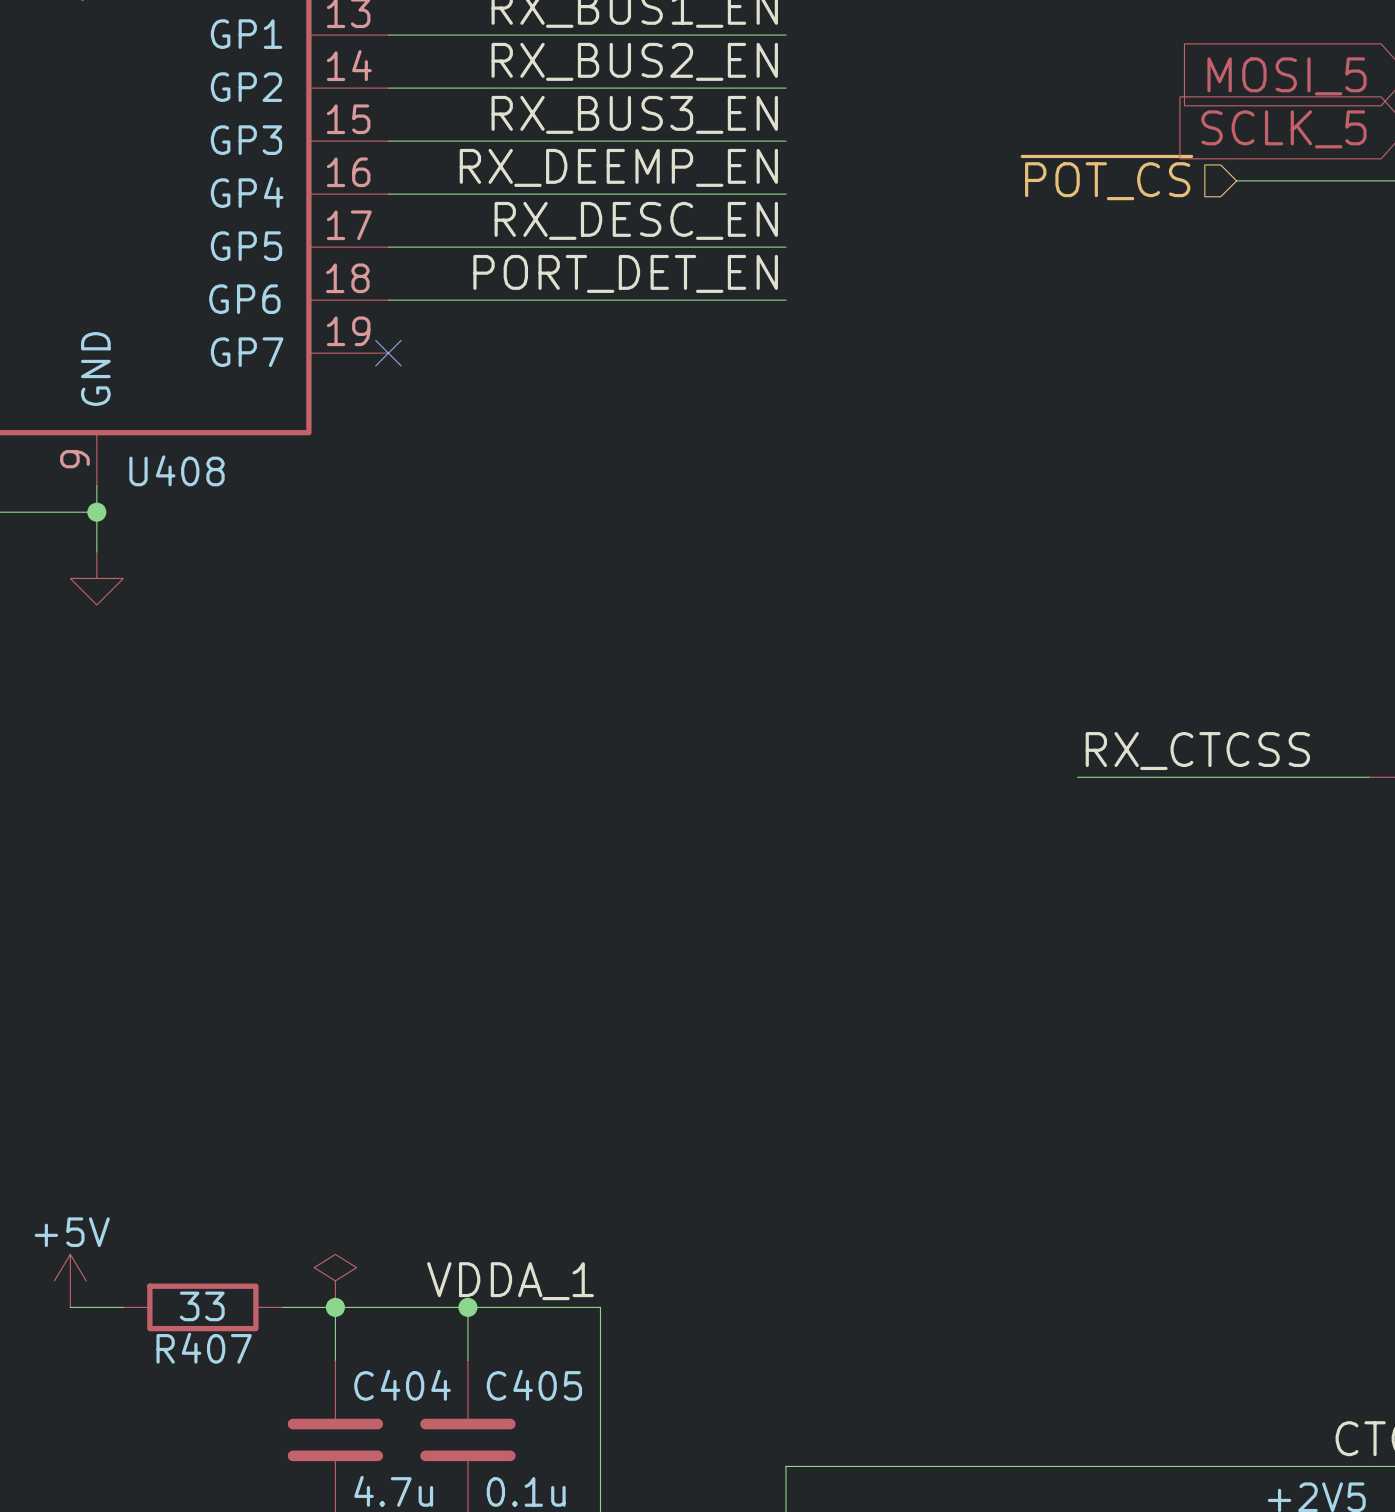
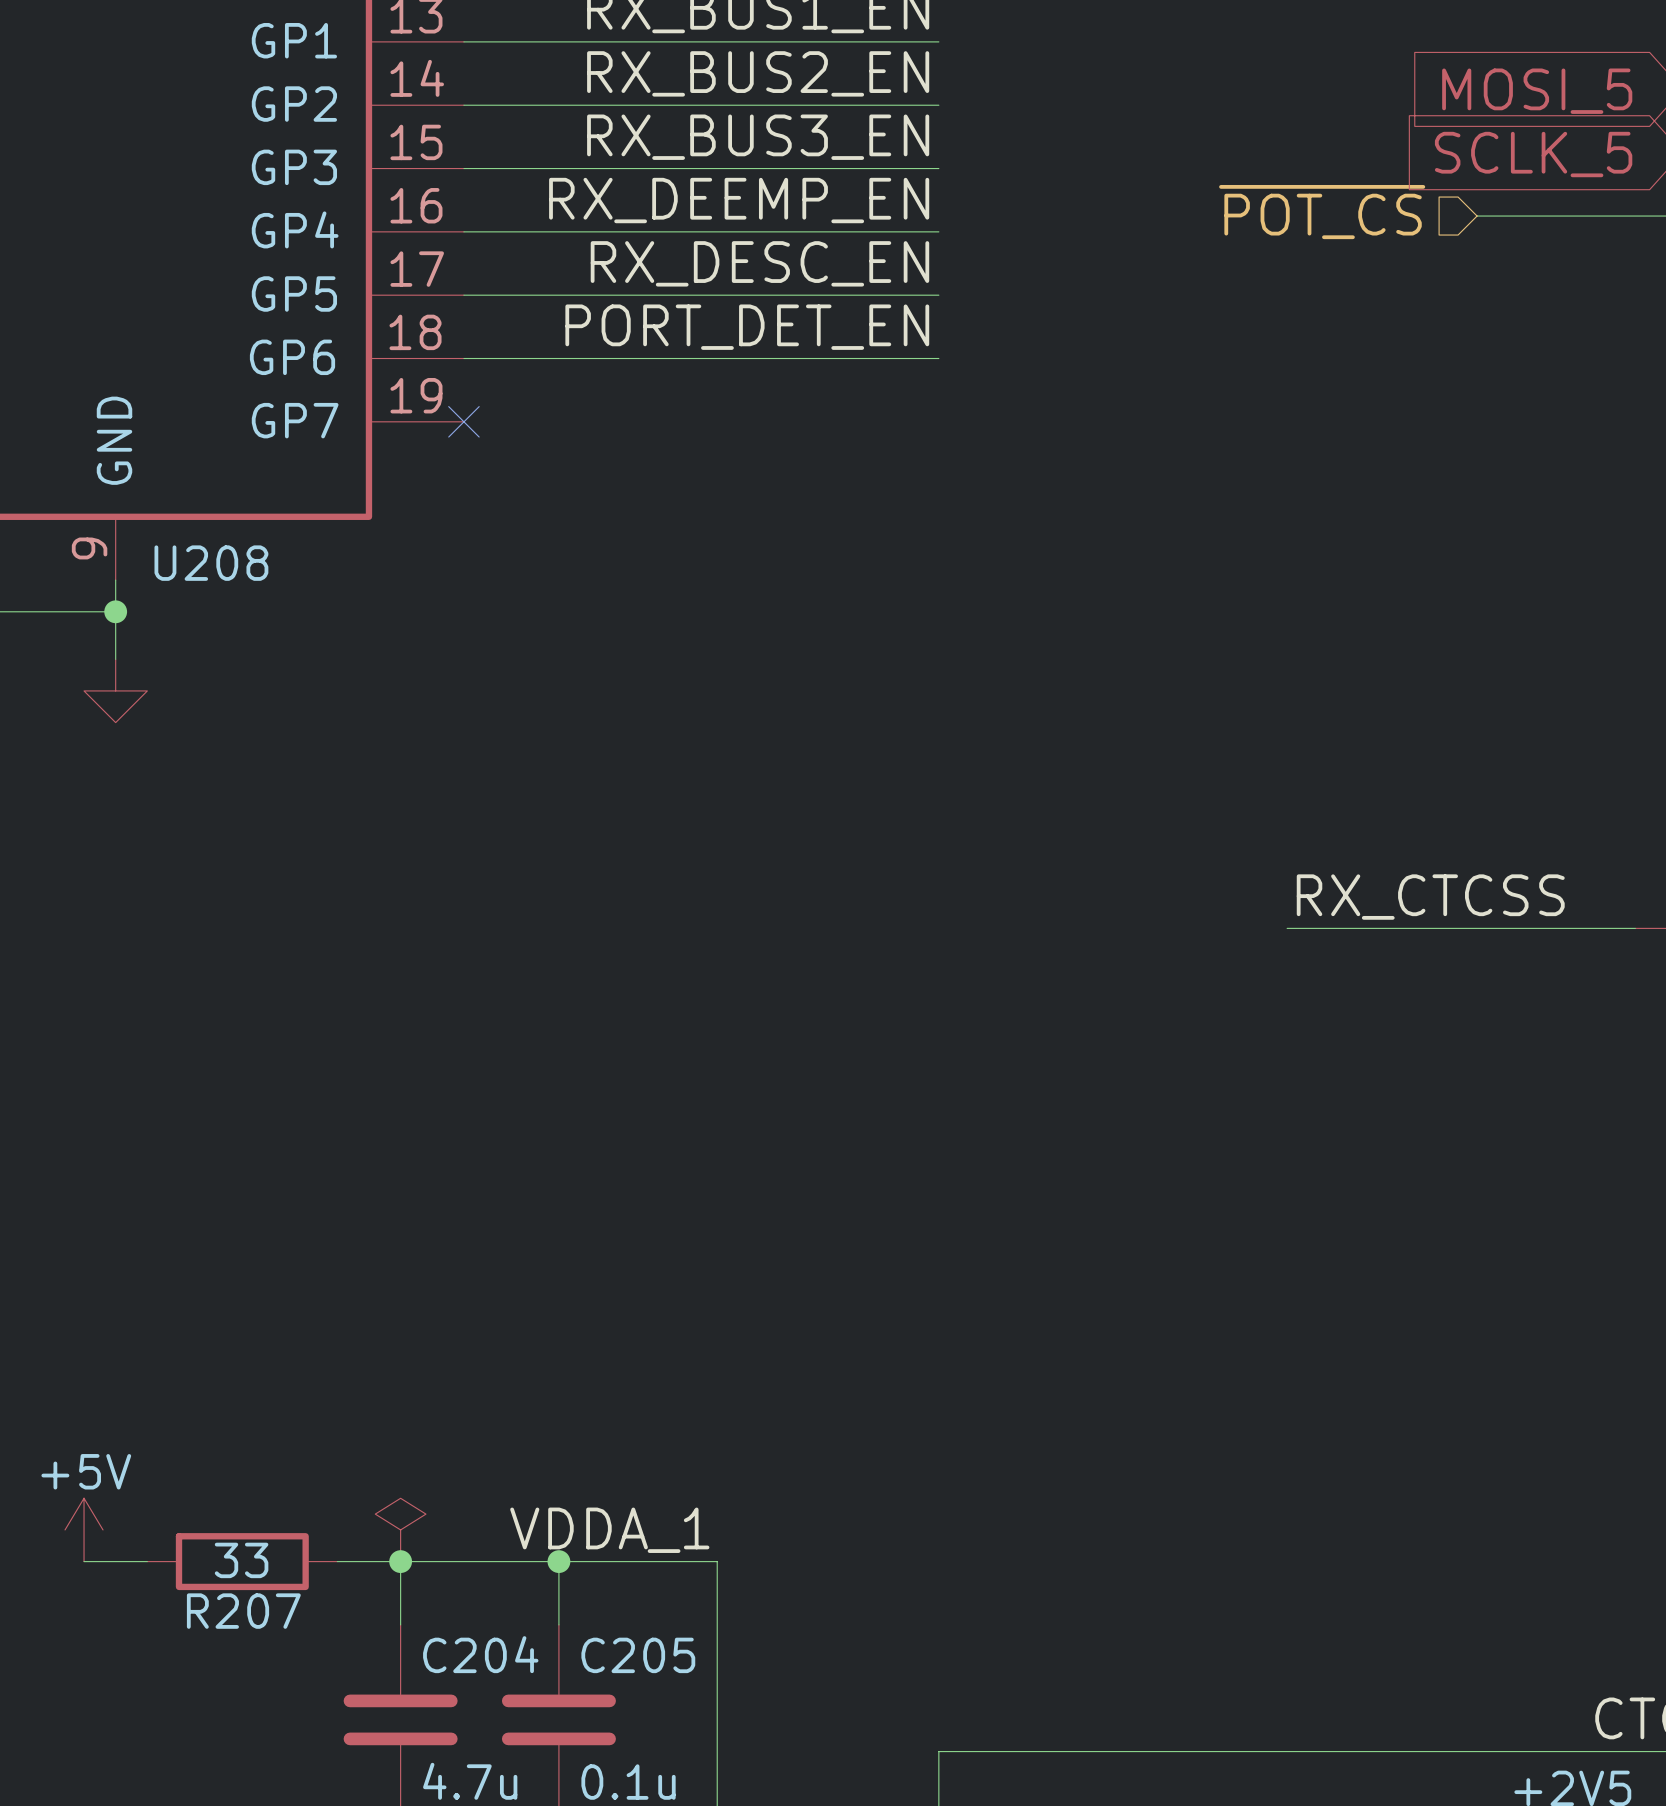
U408 name: U408 (177, 470) -> U208 (211, 563)
R407 name: R407 (204, 1348) -> R207 (243, 1611)
C404 name: C404 (402, 1385) -> C204 (480, 1654)
C405 name: C405 (534, 1385) -> C205 (638, 1655)

